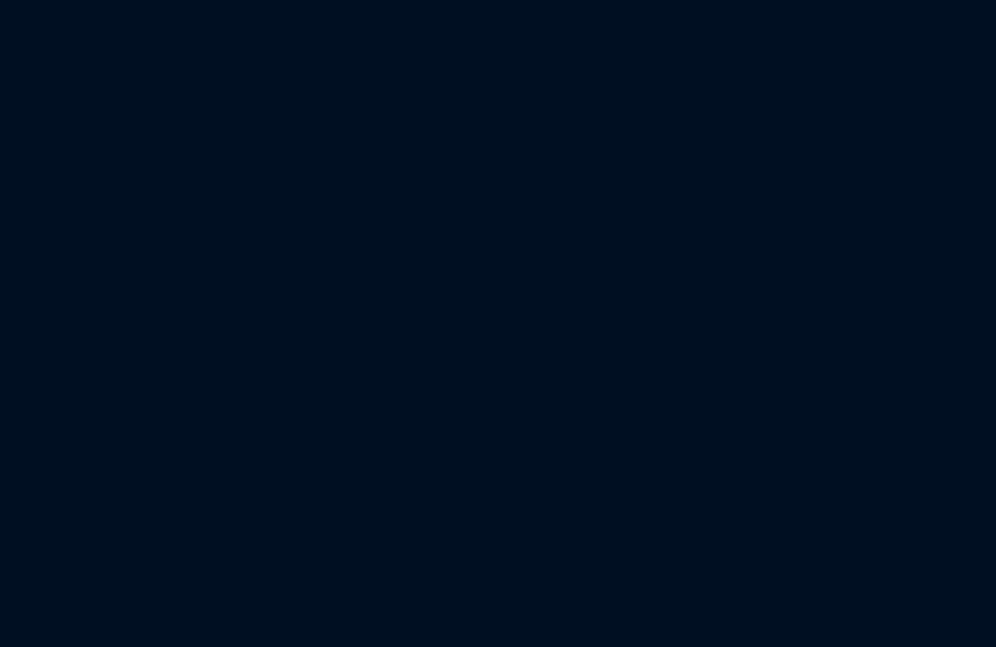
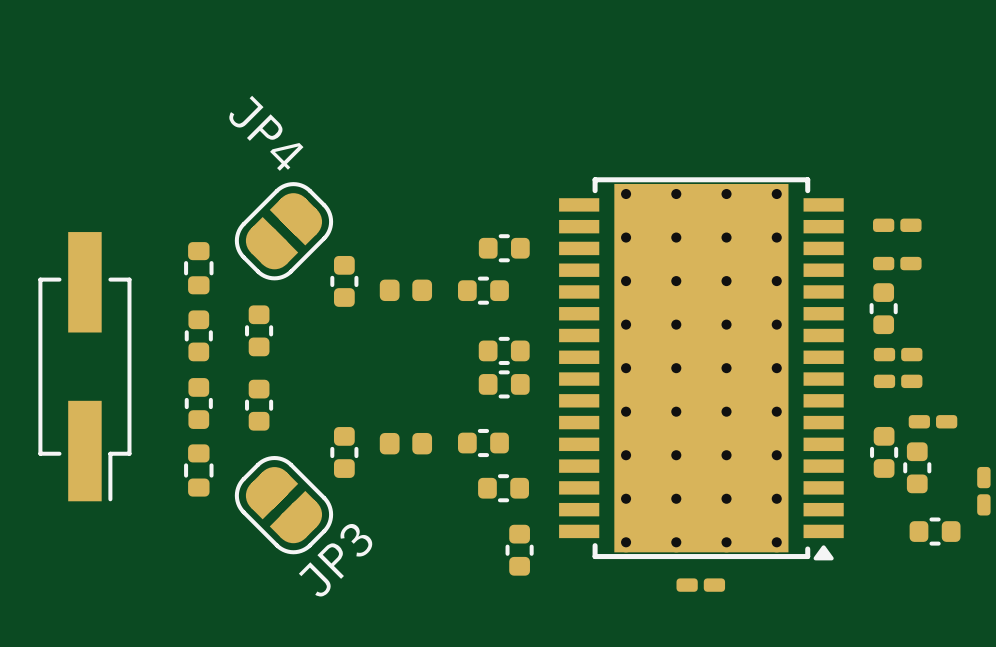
part: none -> (897, 225)
JP4: none -> (283, 231)
part: none -> (504, 248)
part: none -> (897, 263)
part: none -> (198, 268)
part: none -> (344, 281)
part: none -> (405, 290)
part: none -> (483, 290)
part: none -> (883, 308)
part: none -> (259, 330)
part: none -> (198, 335)
part: none -> (504, 350)
part: none -> (898, 354)
part: none -> (84, 366)
part: none -> (701, 368)
part: none -> (898, 381)
part: none -> (504, 384)
part: none -> (198, 403)
part: none -> (259, 405)
part: none -> (932, 421)
part: none -> (405, 443)
part: none -> (483, 443)
part: none -> (344, 452)
part: none -> (884, 452)
part: none -> (917, 467)
part: none -> (198, 470)
part: none -> (503, 488)
part: none -> (983, 491)
JP3: none -> (283, 505)
part: none -> (935, 531)
part: none -> (519, 550)
part: none -> (700, 585)

